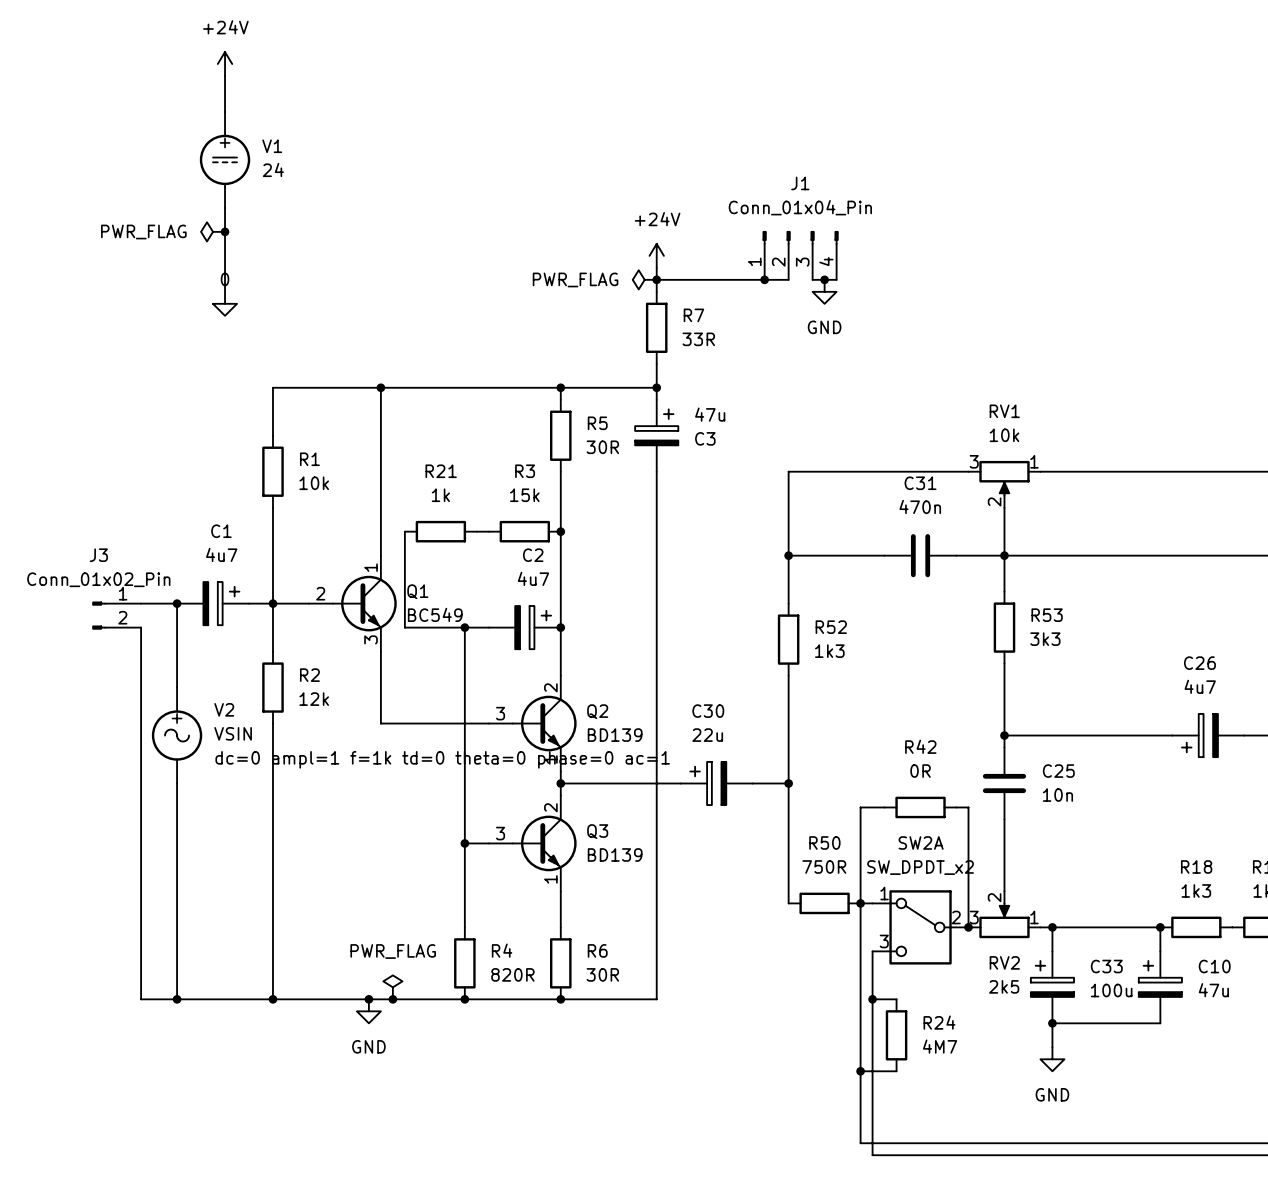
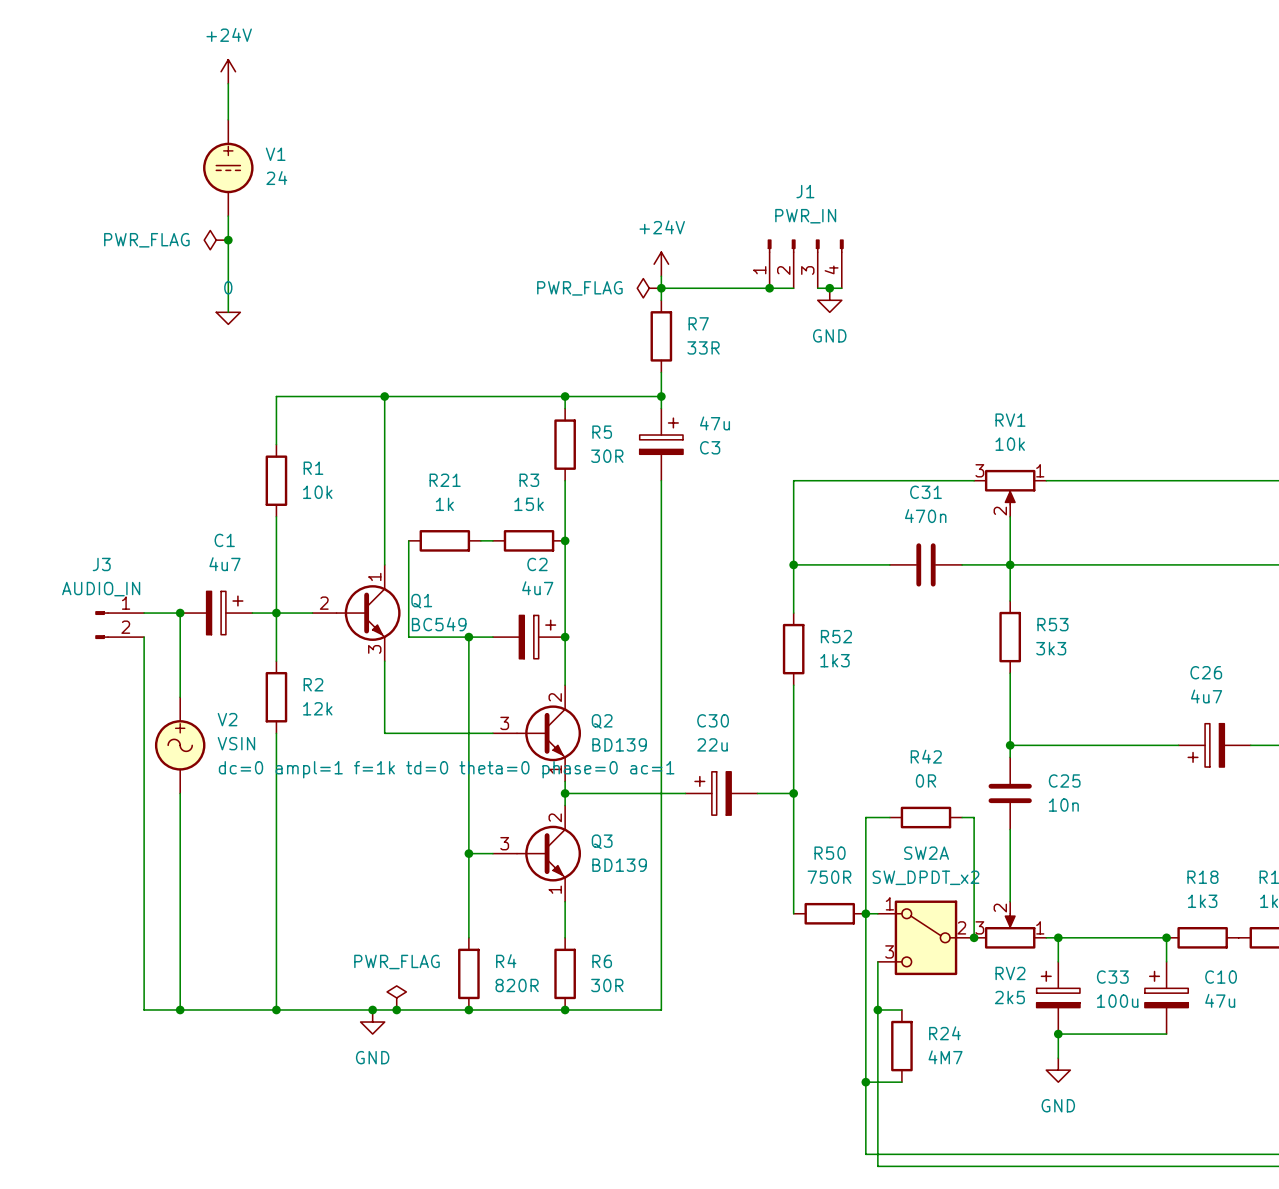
J1 value: Conn_01x04_Pin (800, 207) -> PWR_IN (805, 216)
J3 value: Conn_01x02_Pin (98, 579) -> AUDIO_IN (101, 589)

